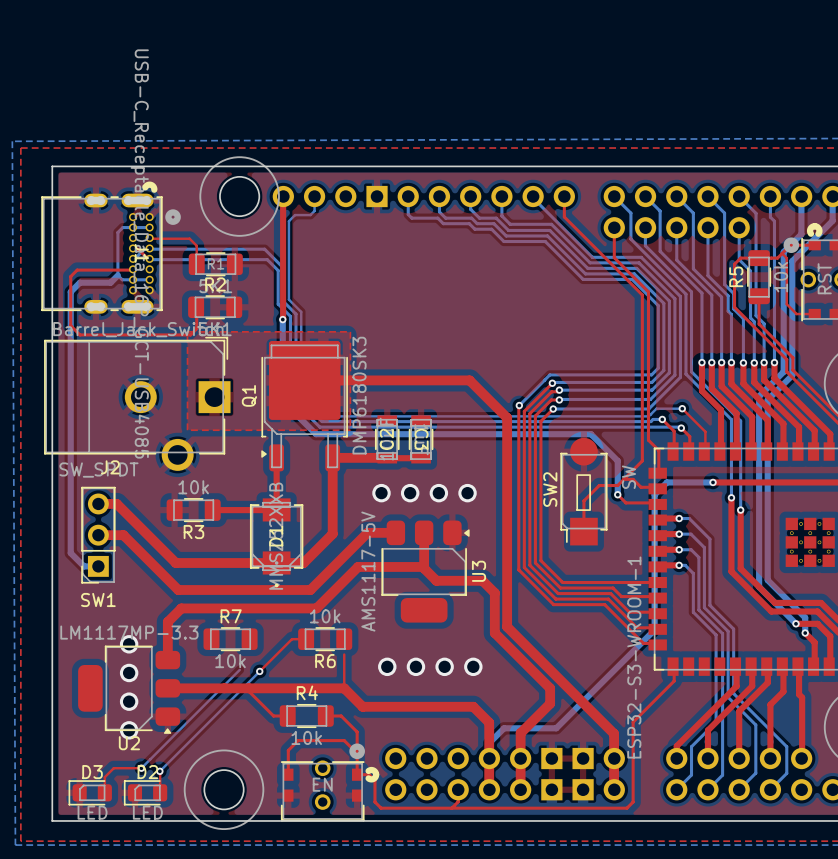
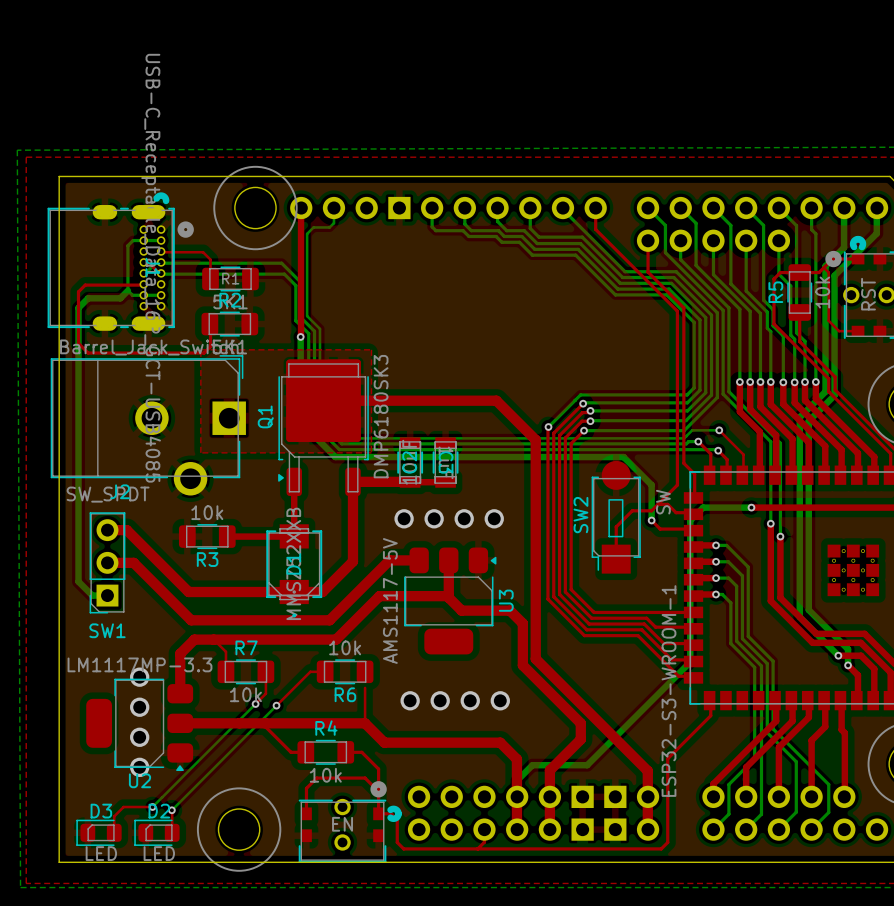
top track: none -> (213, 639) (225, 651) (225, 671)
top track: none -> (265, 671) (265, 693) (255, 704)
via: none -> (255, 704)

